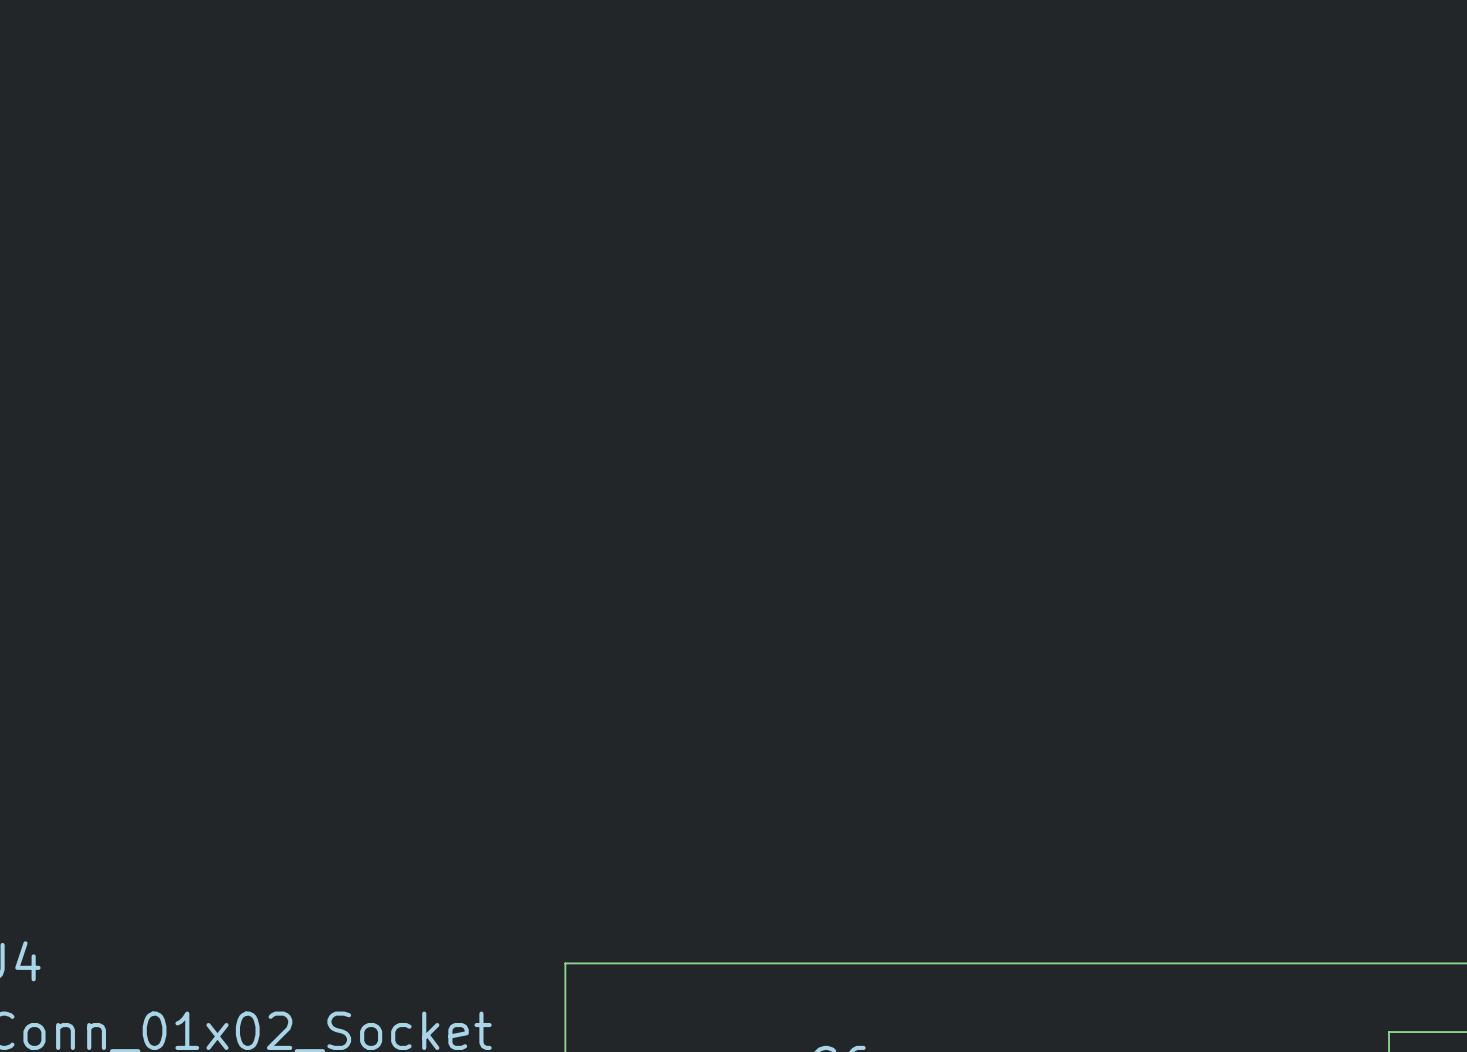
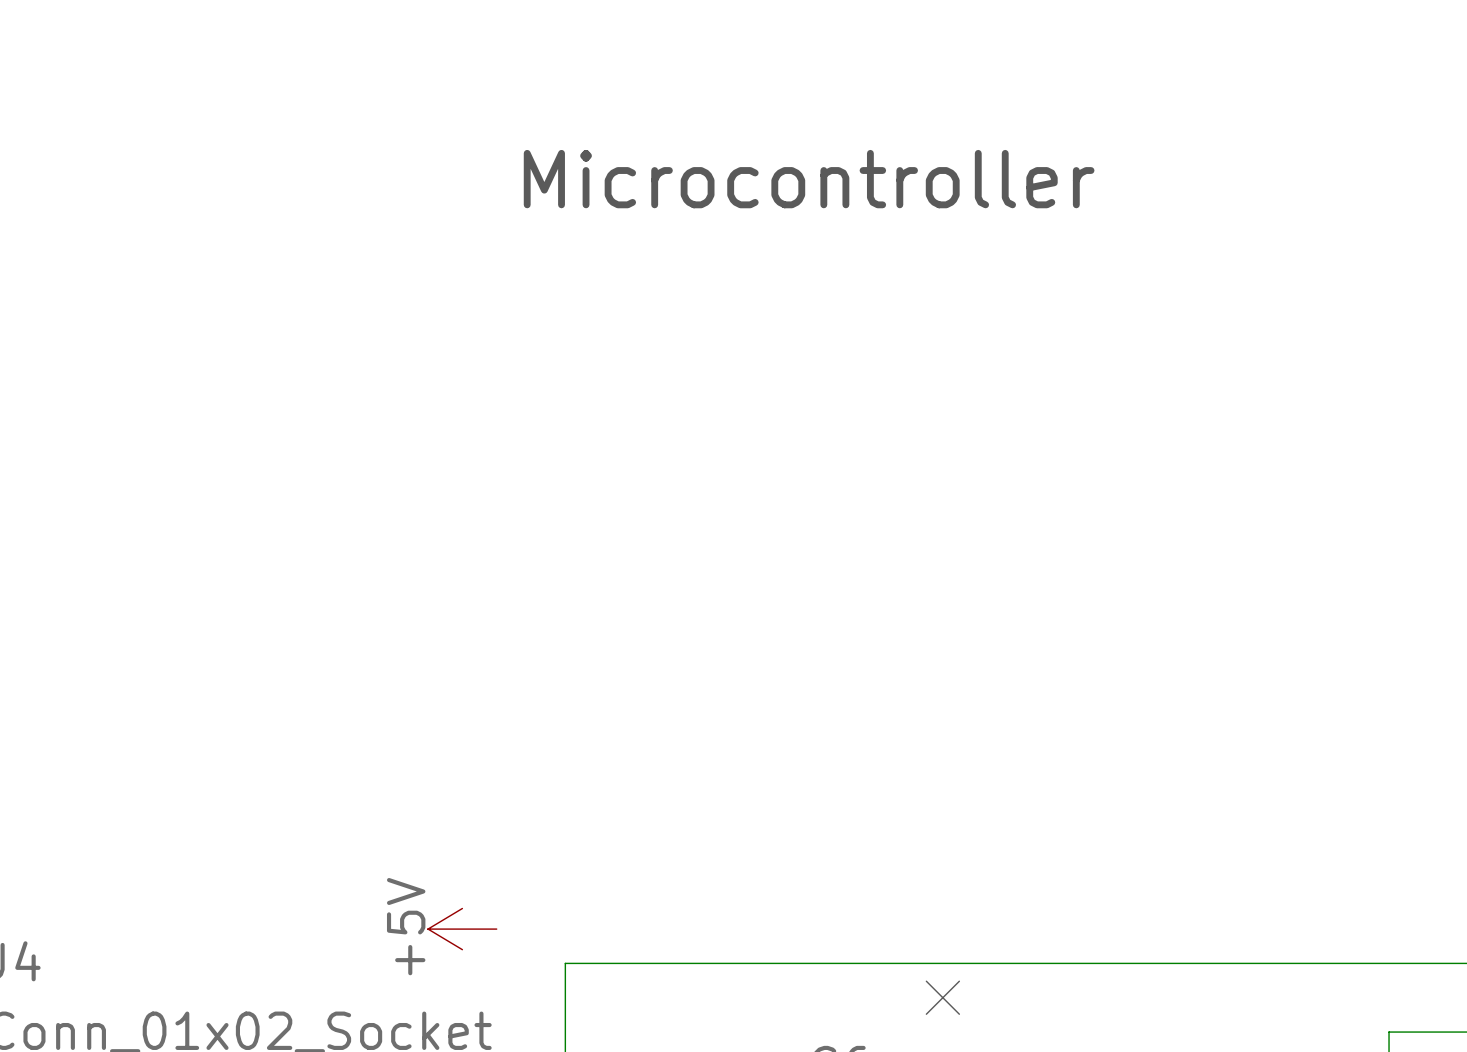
text: none -> Microcontroller (809, 179)
power symbol: none -> +5V (462, 929)
no-connect mark: none -> (942, 997)

